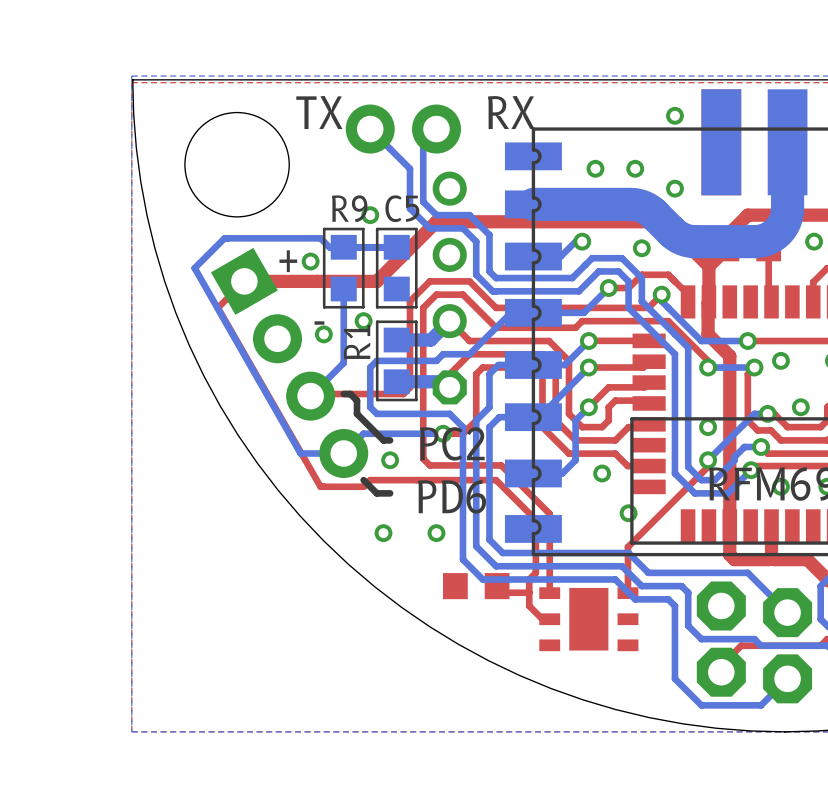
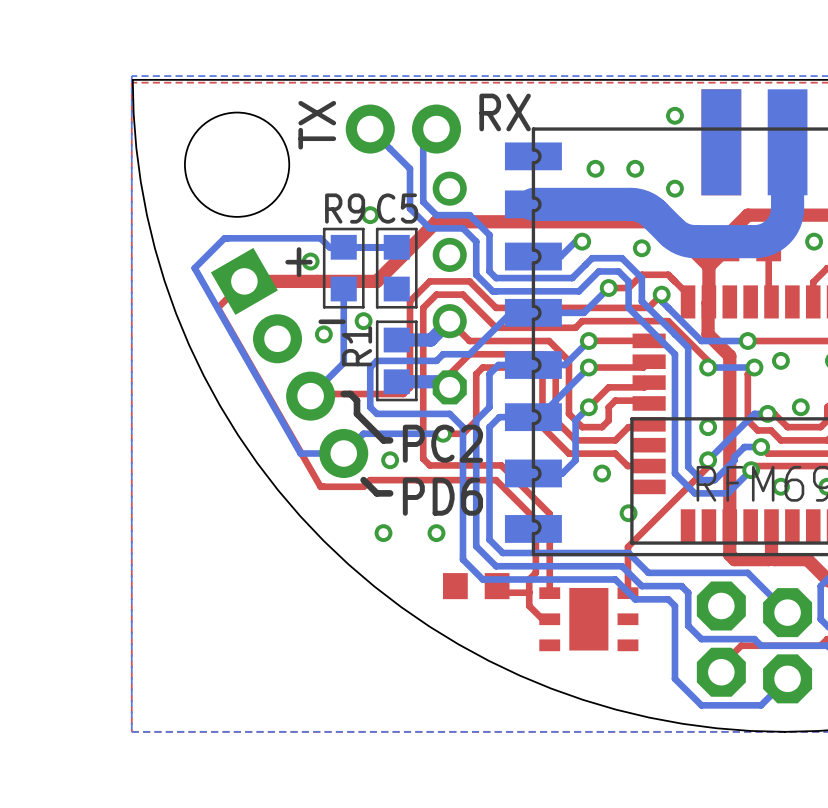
text rotation: 0° (319, 112) -> 90° counterclockwise (317, 125)

